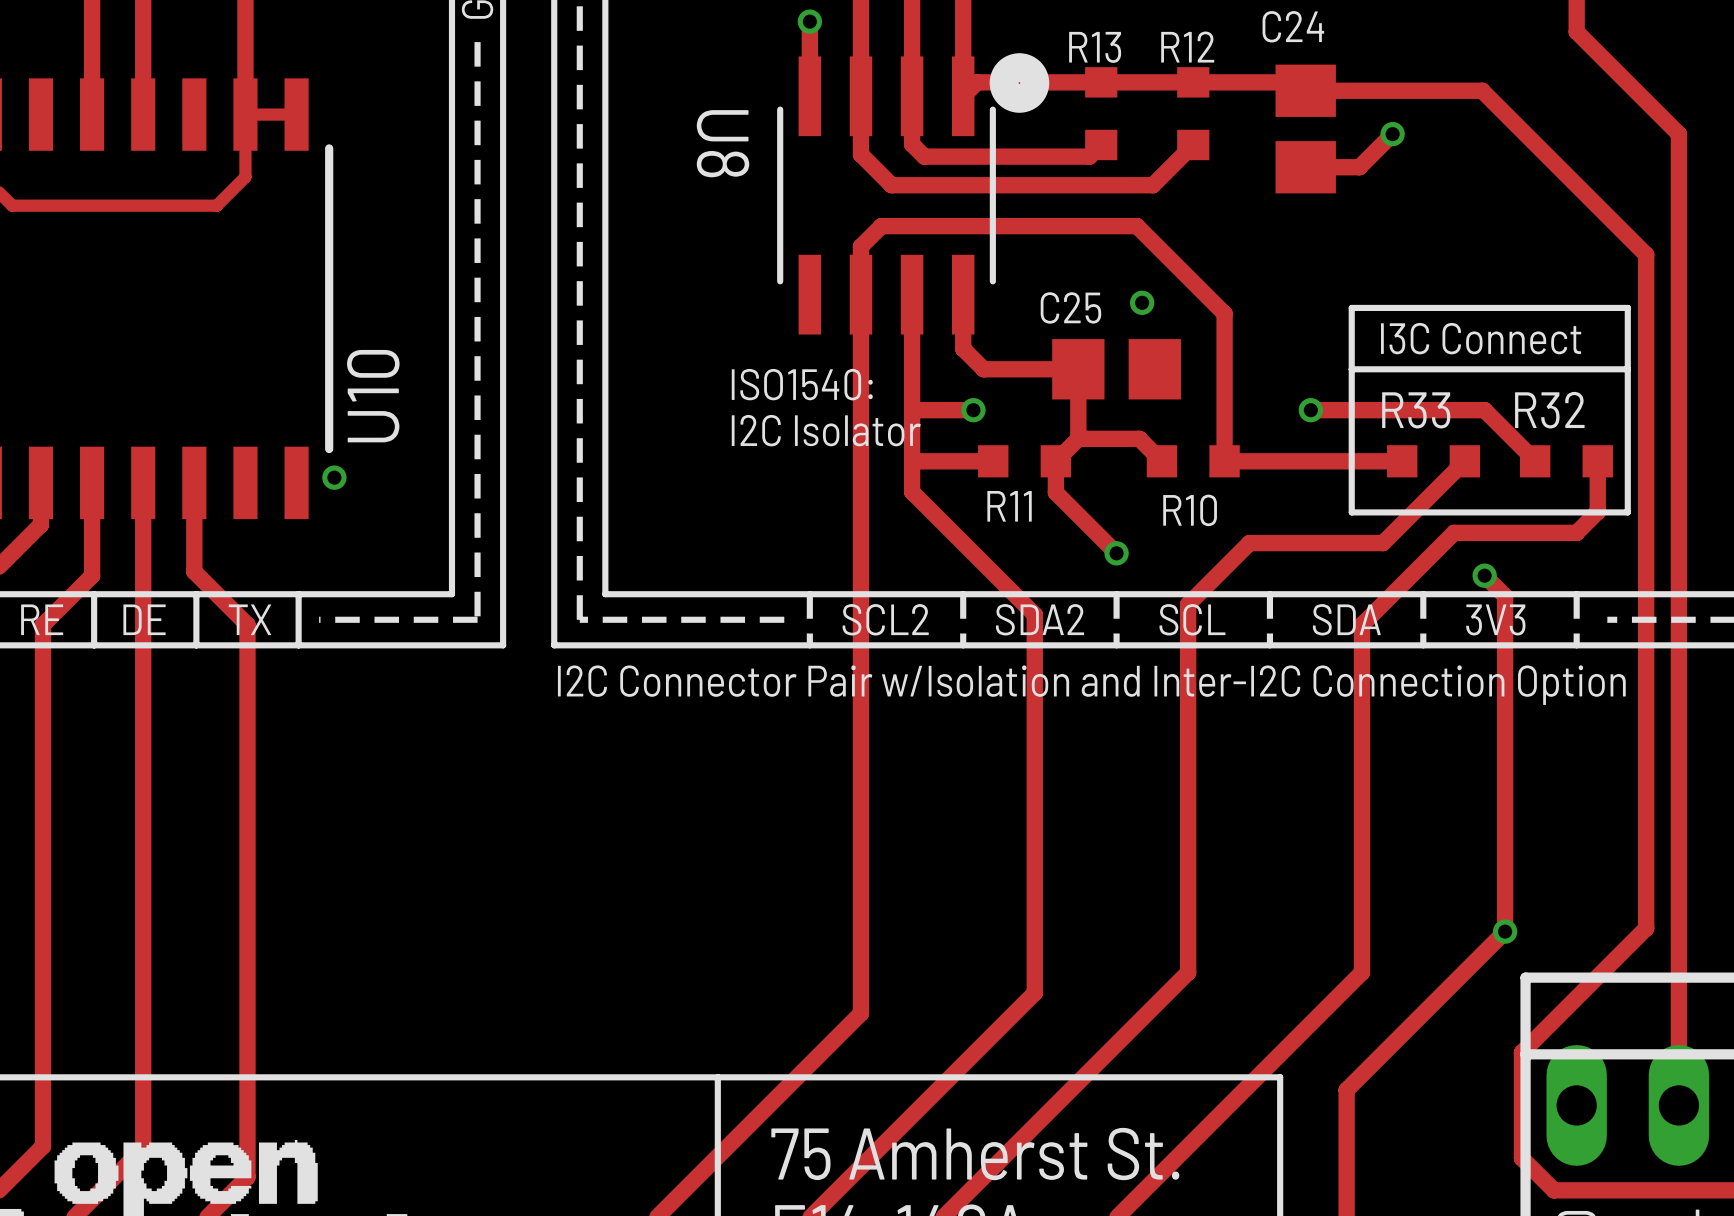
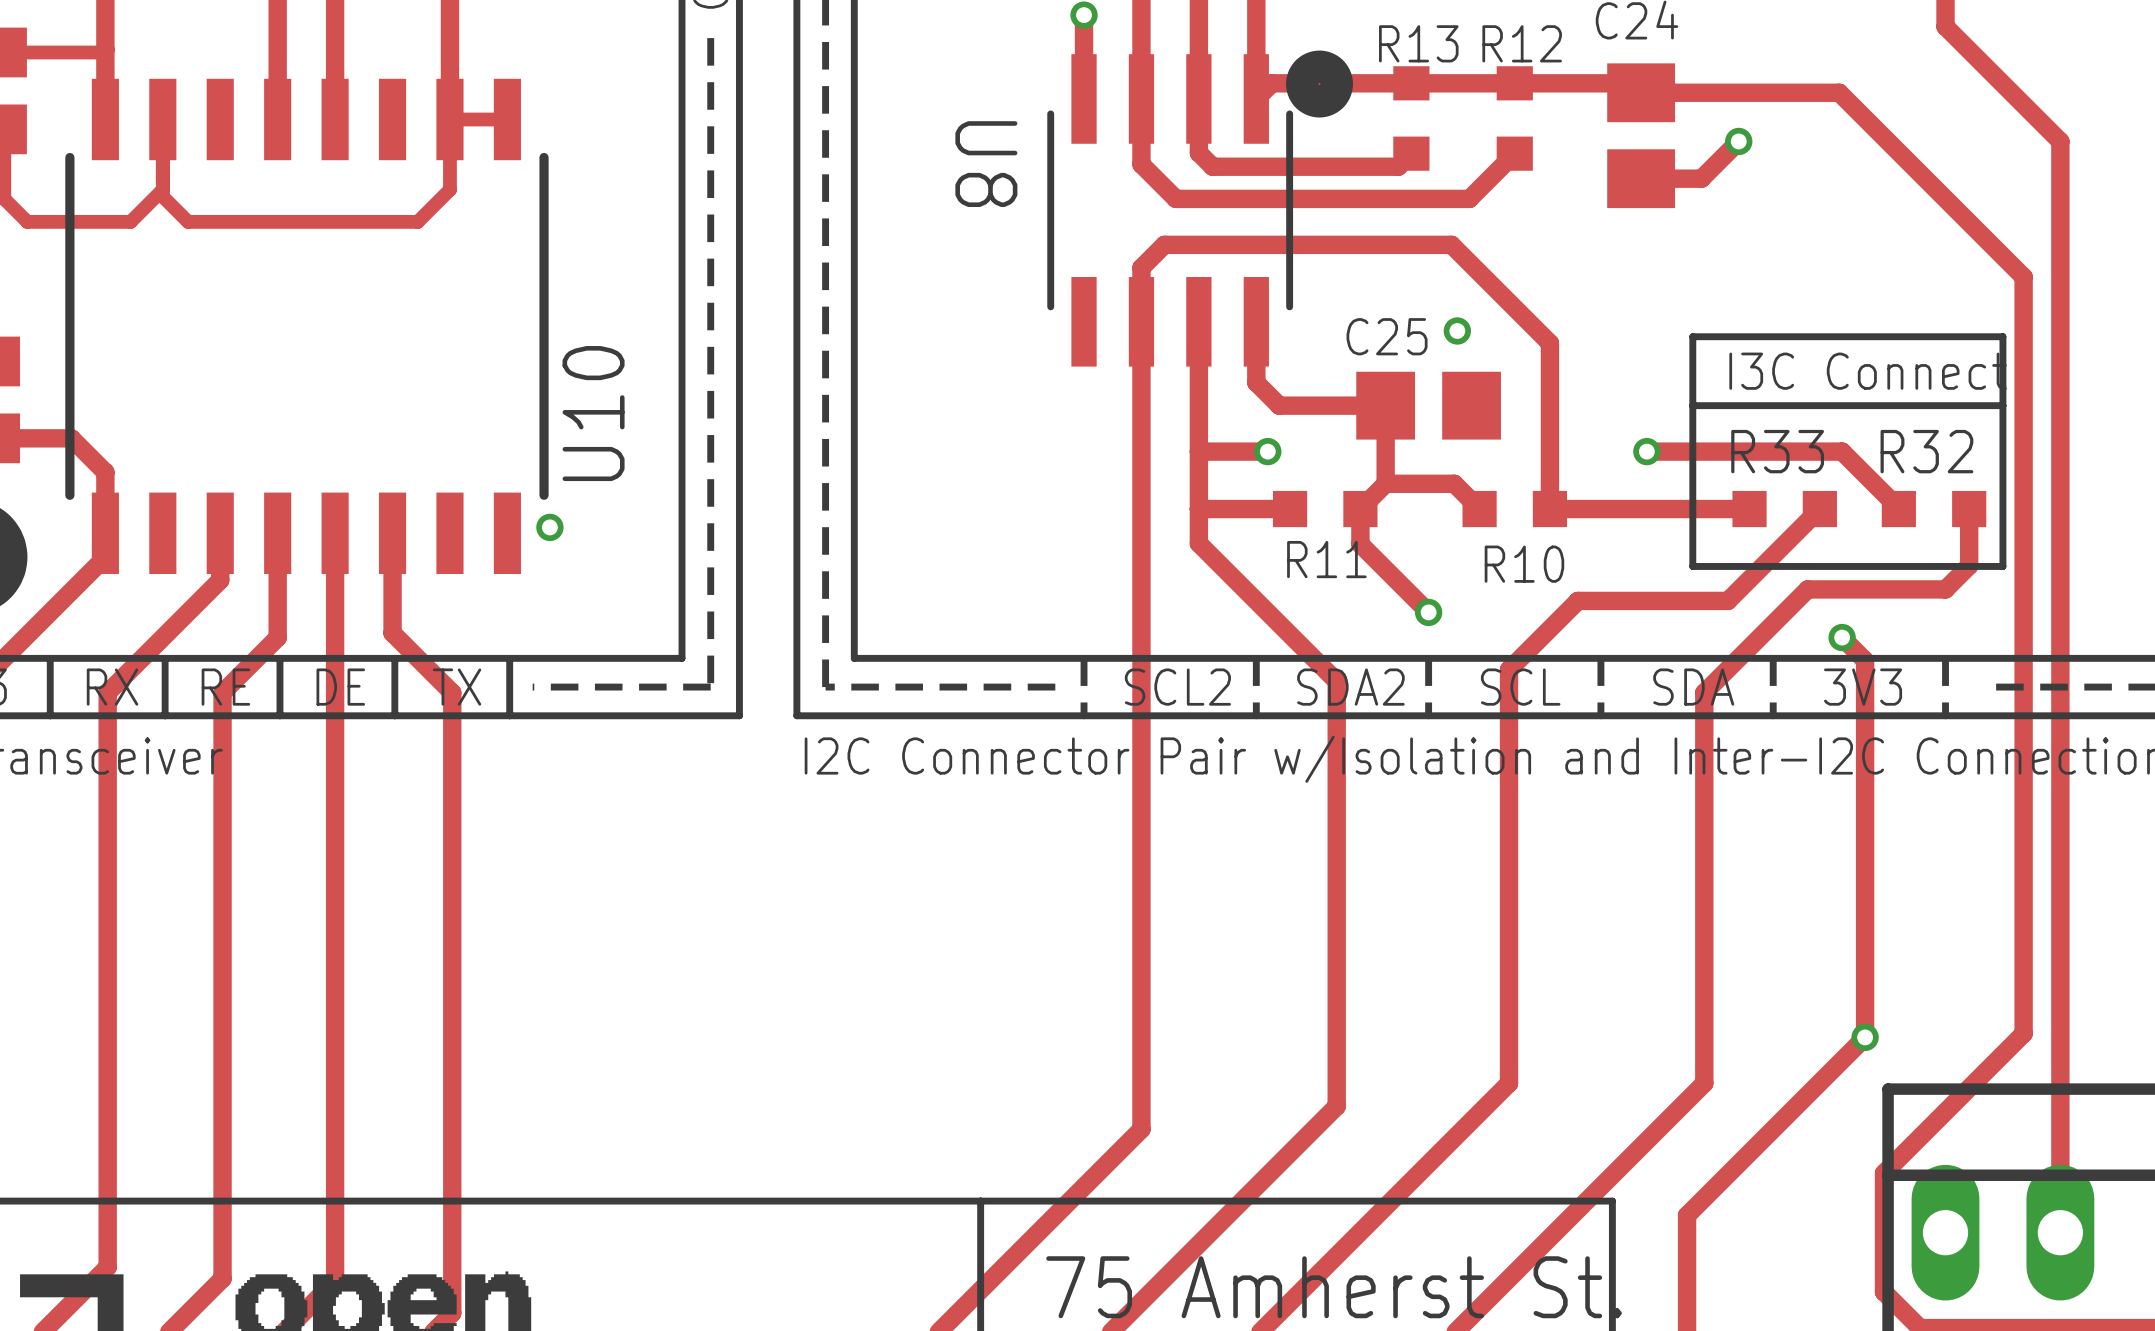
text: ISO1540: (802, 384) -> none
text: I2C Isolator (826, 430) -> none

